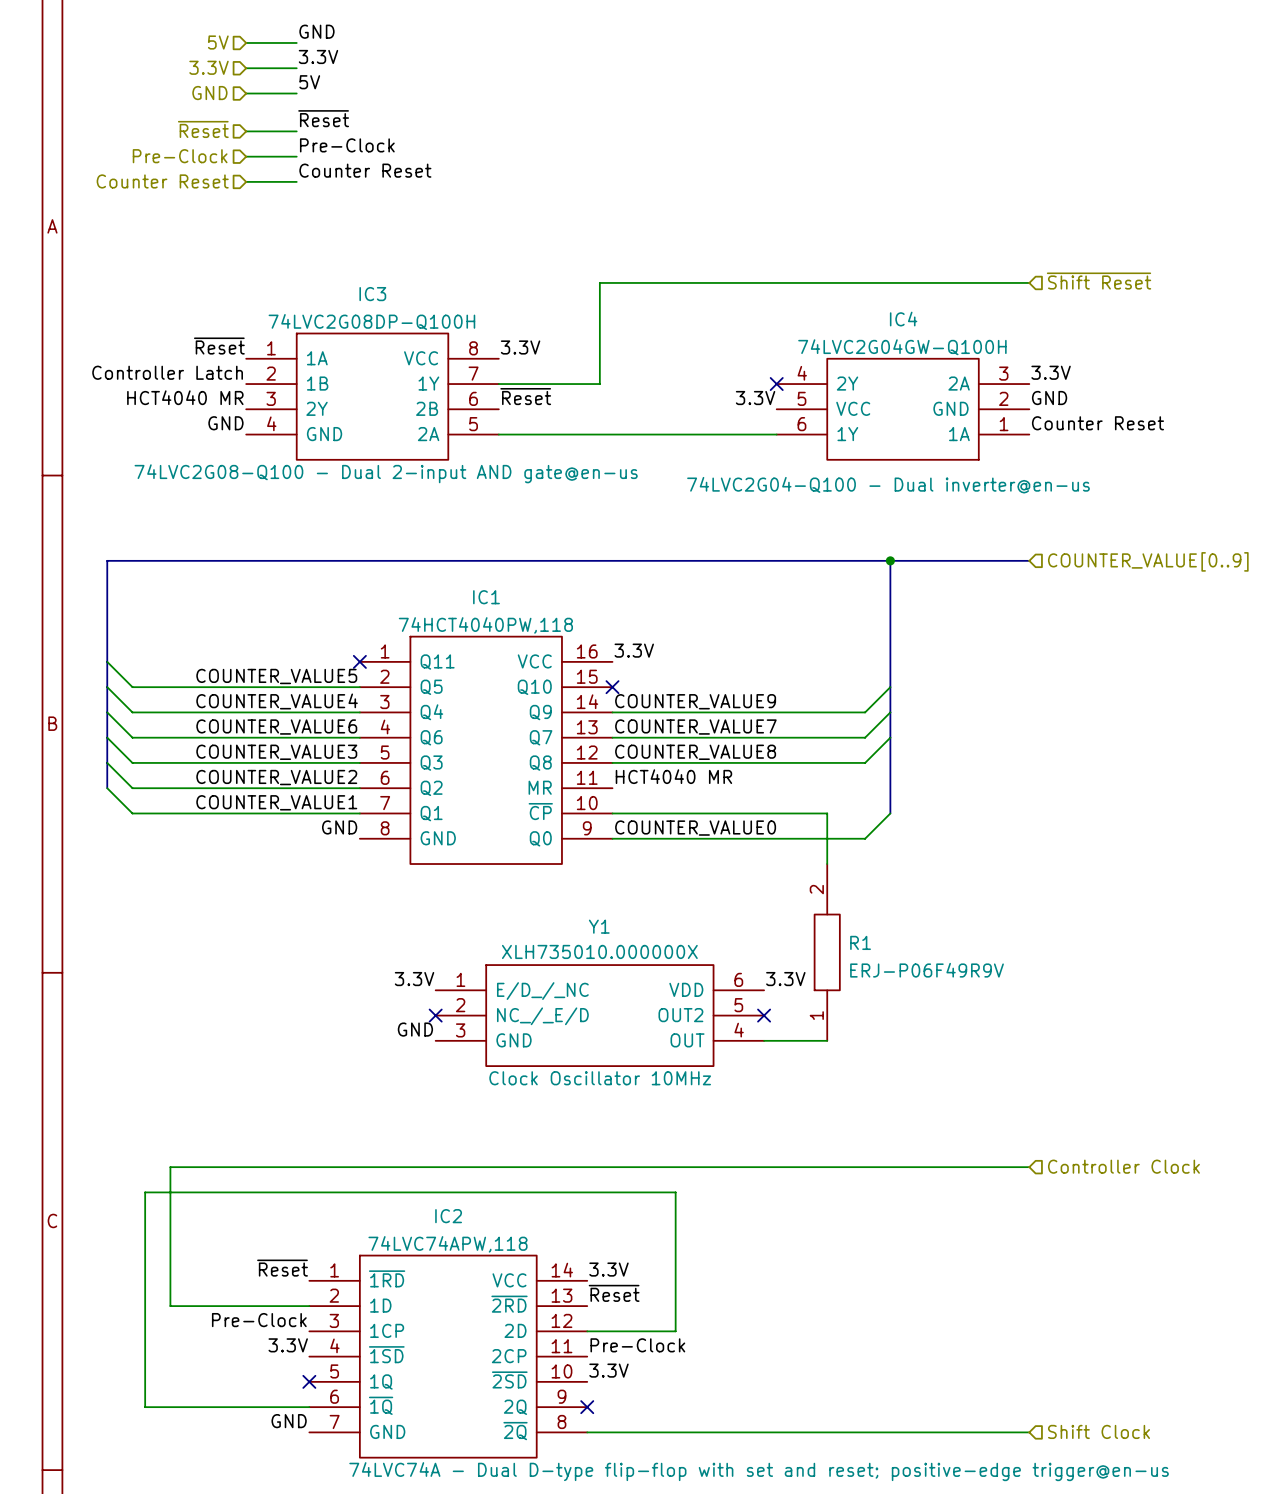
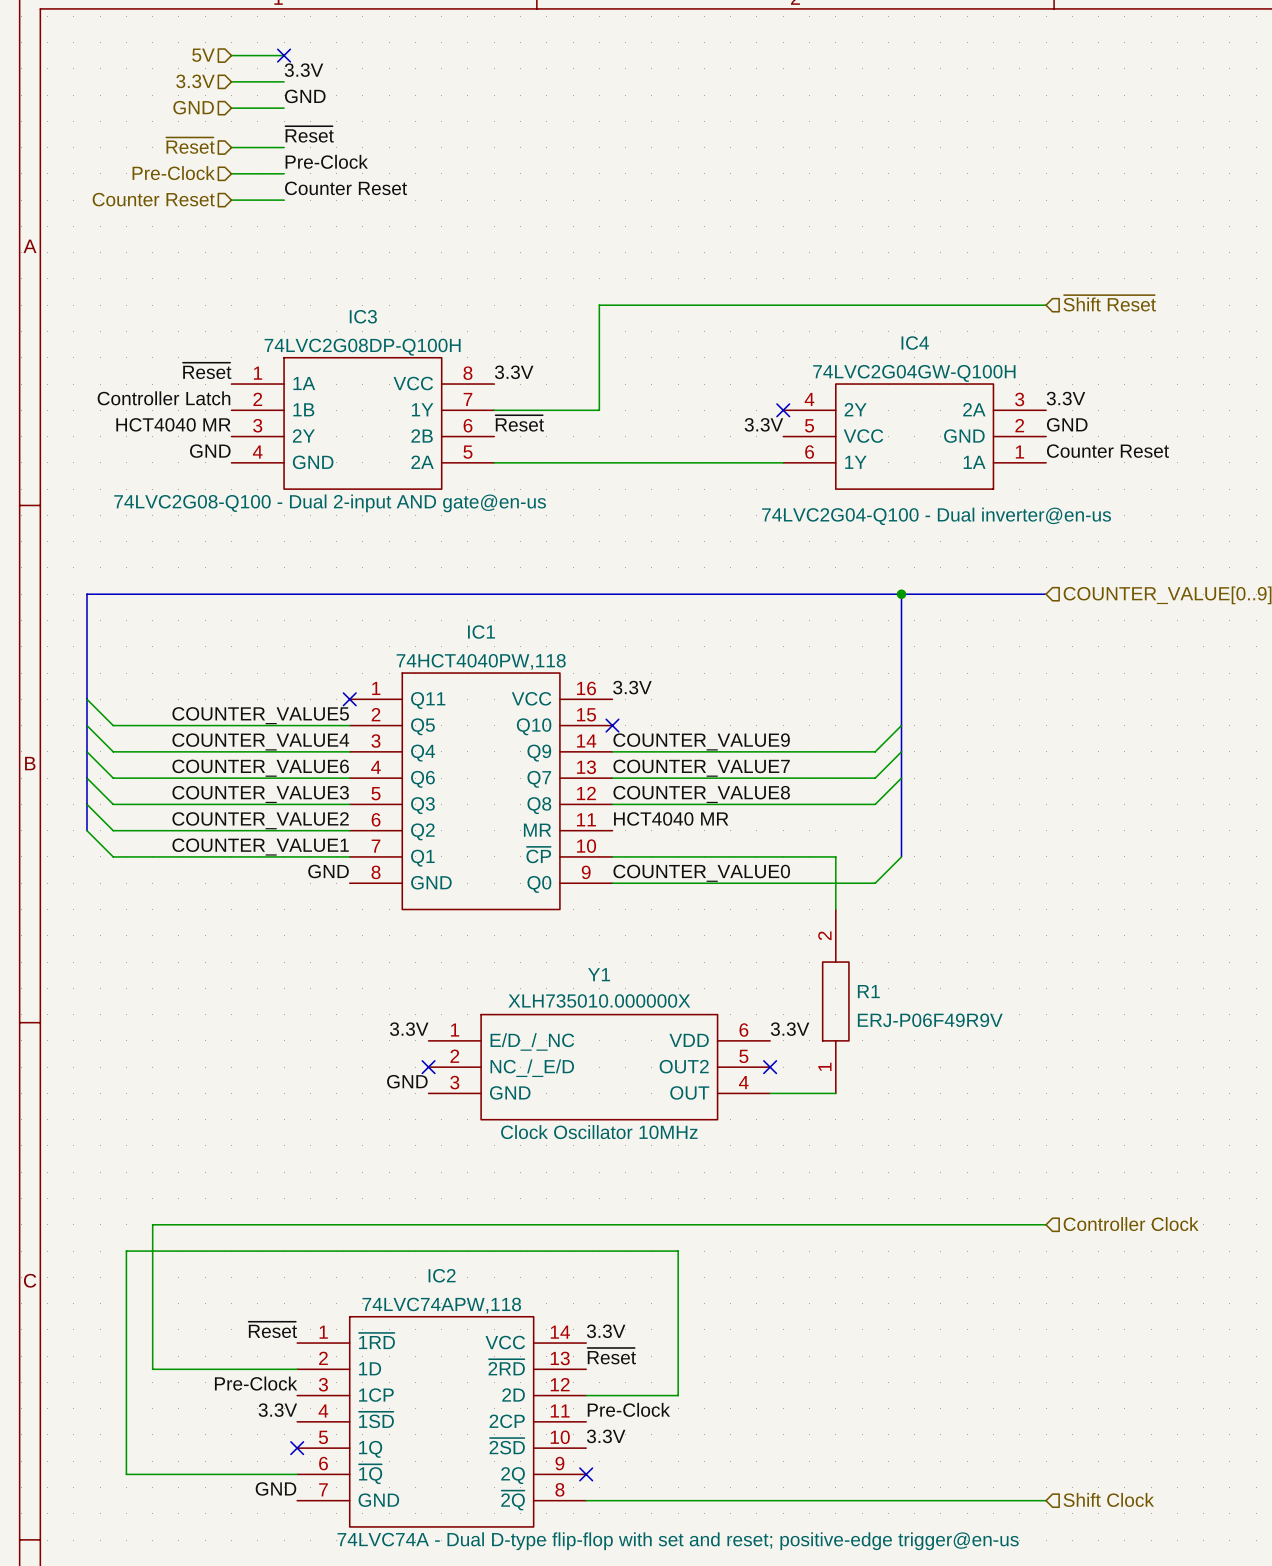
label: GND (316, 31) -> none
no-connect mark: none -> (284, 55)
label: 5V (309, 82) -> GND (305, 96)

